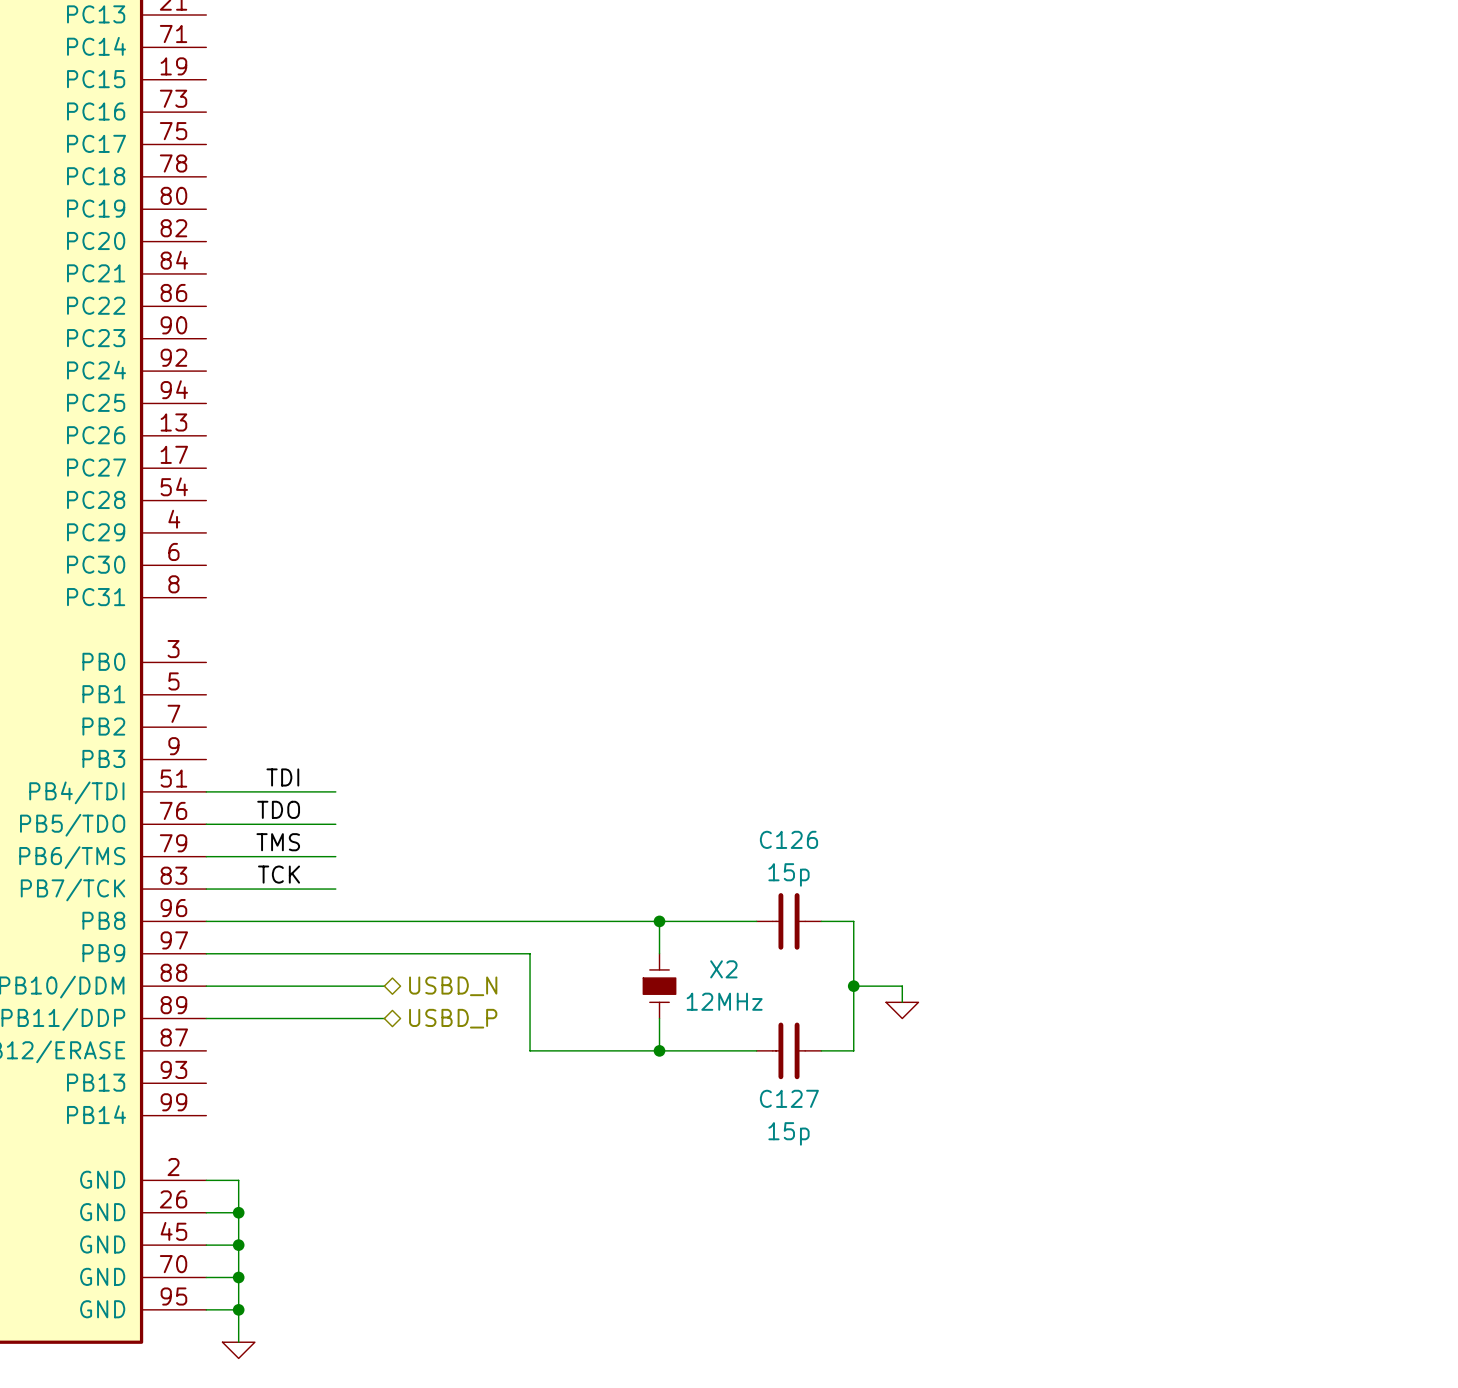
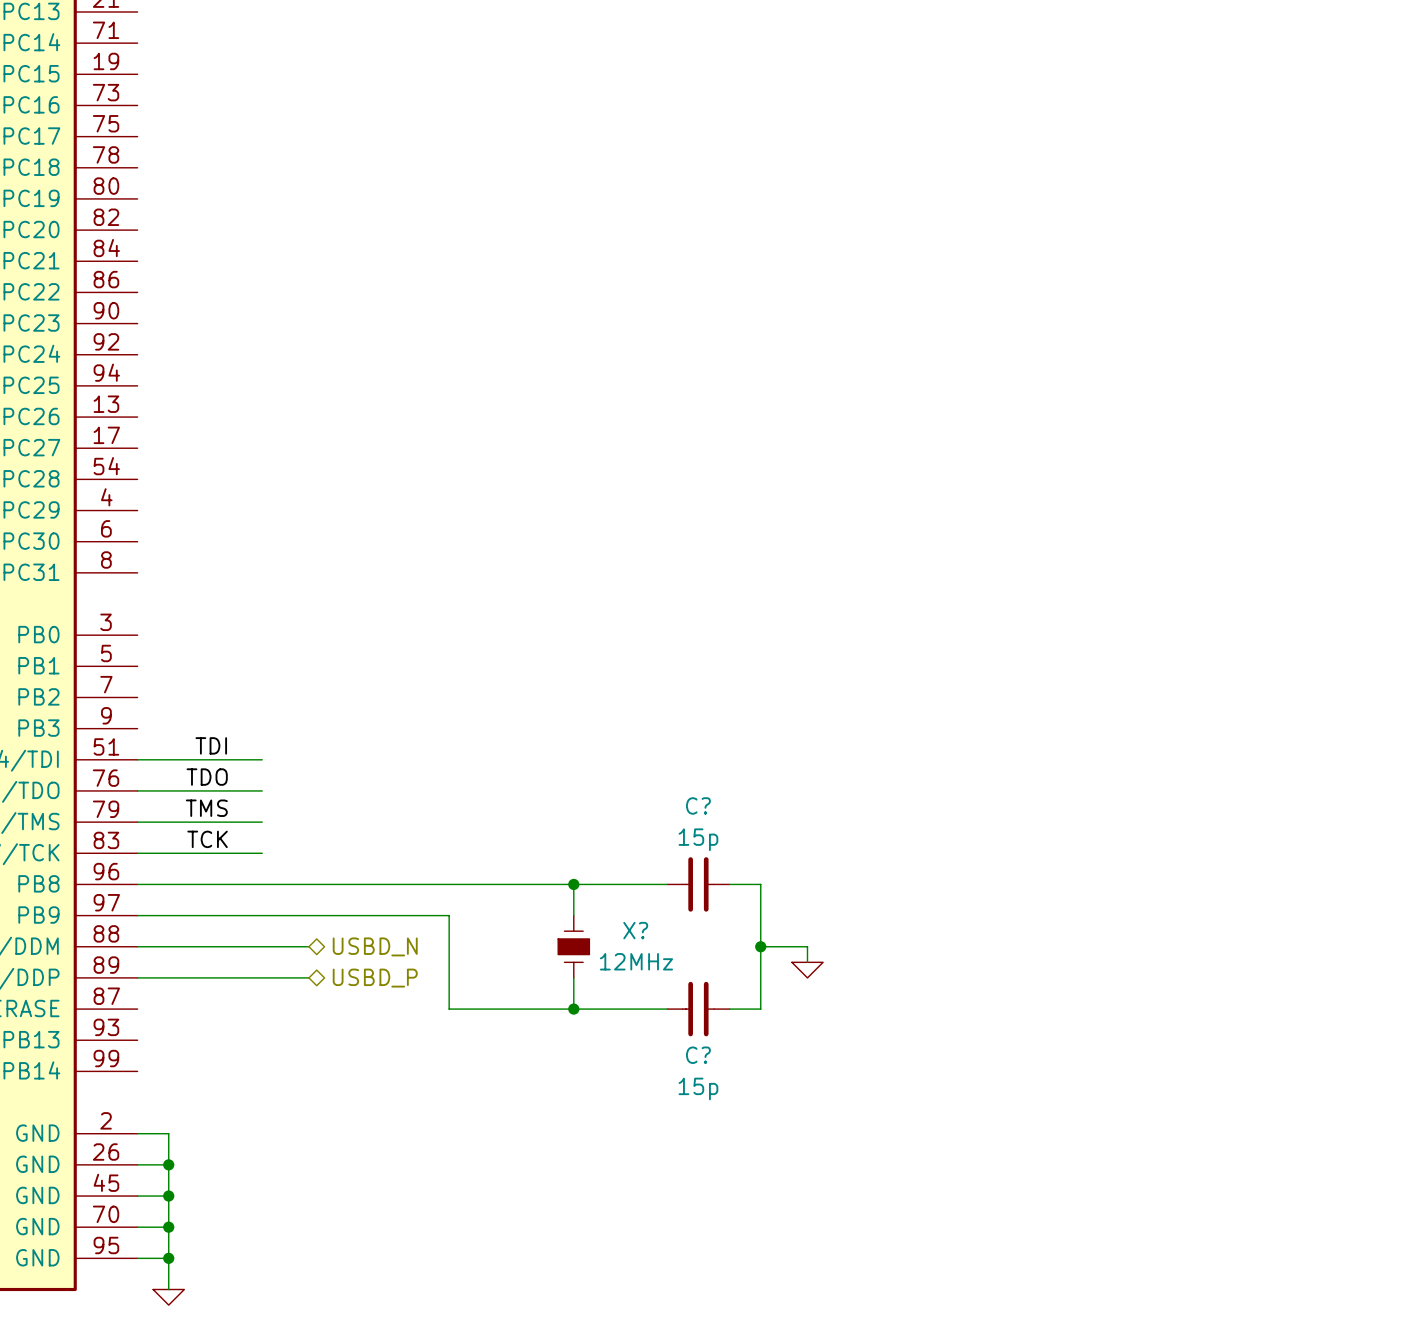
C126 name: C126 (788, 839) -> C? (698, 805)
X2 name: X2 (723, 969) -> X? (635, 930)
C127 name: C127 (789, 1098) -> C? (698, 1055)

